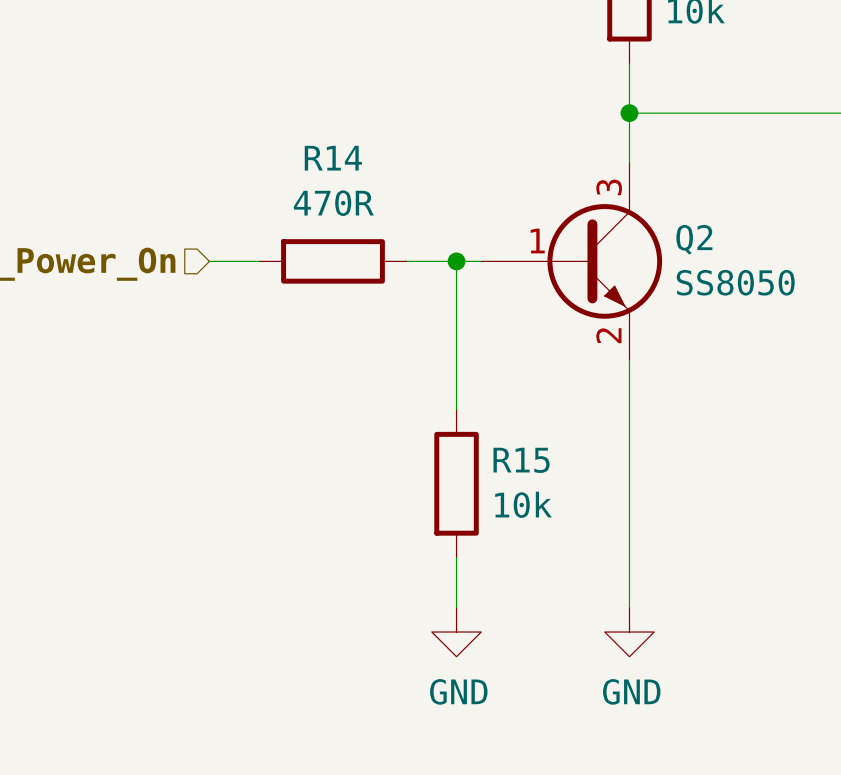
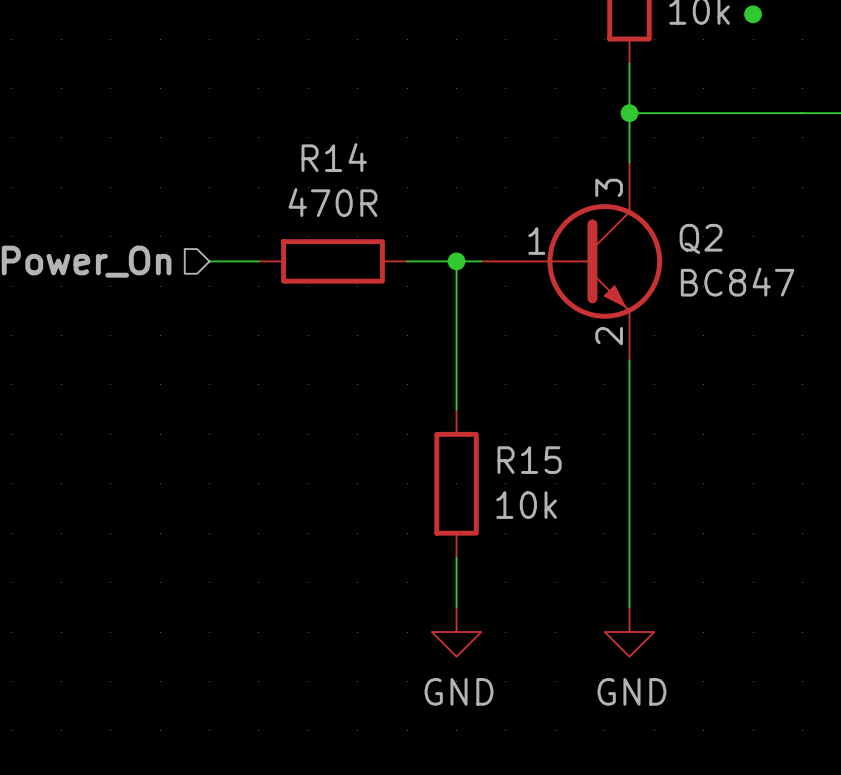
junction: none -> (753, 14)
Q2 value: SS8050 (735, 282) -> BC847 (737, 282)

